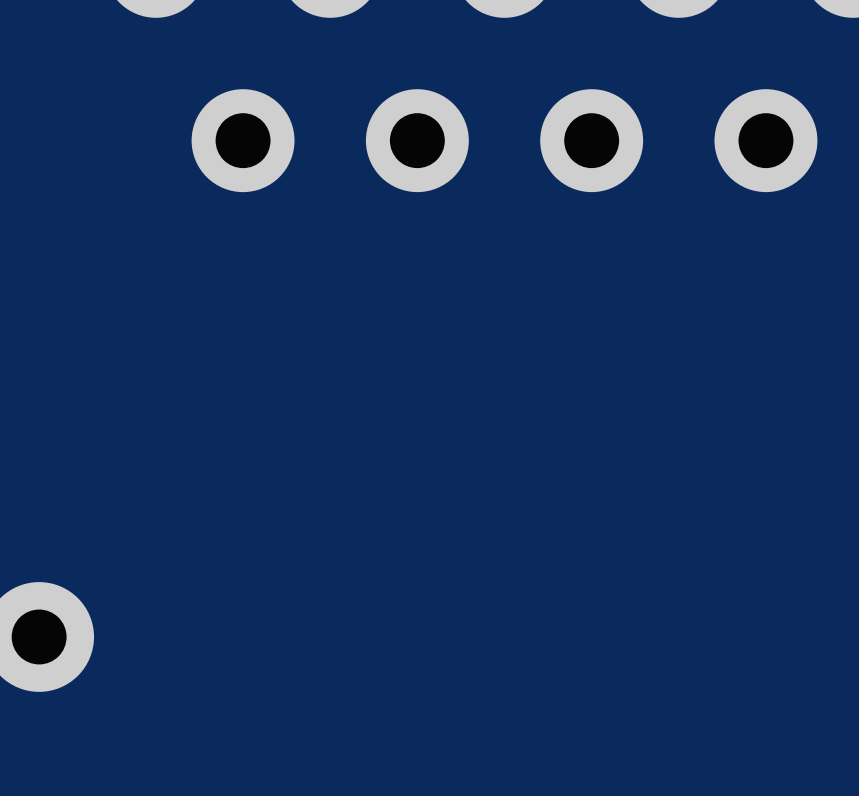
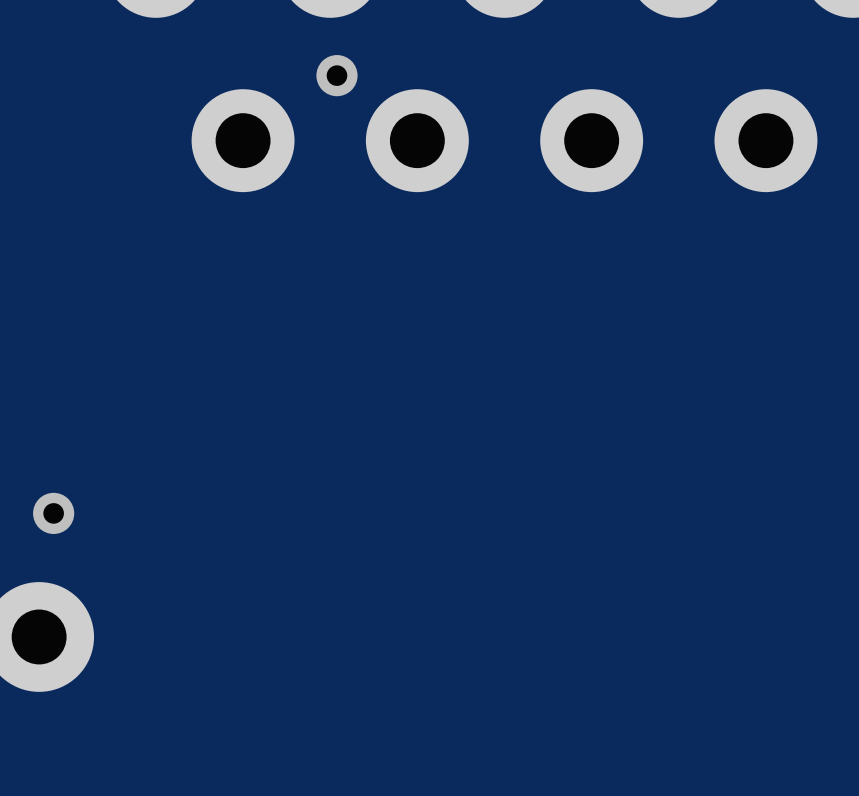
via: none -> (336, 75)
via: none -> (53, 513)

